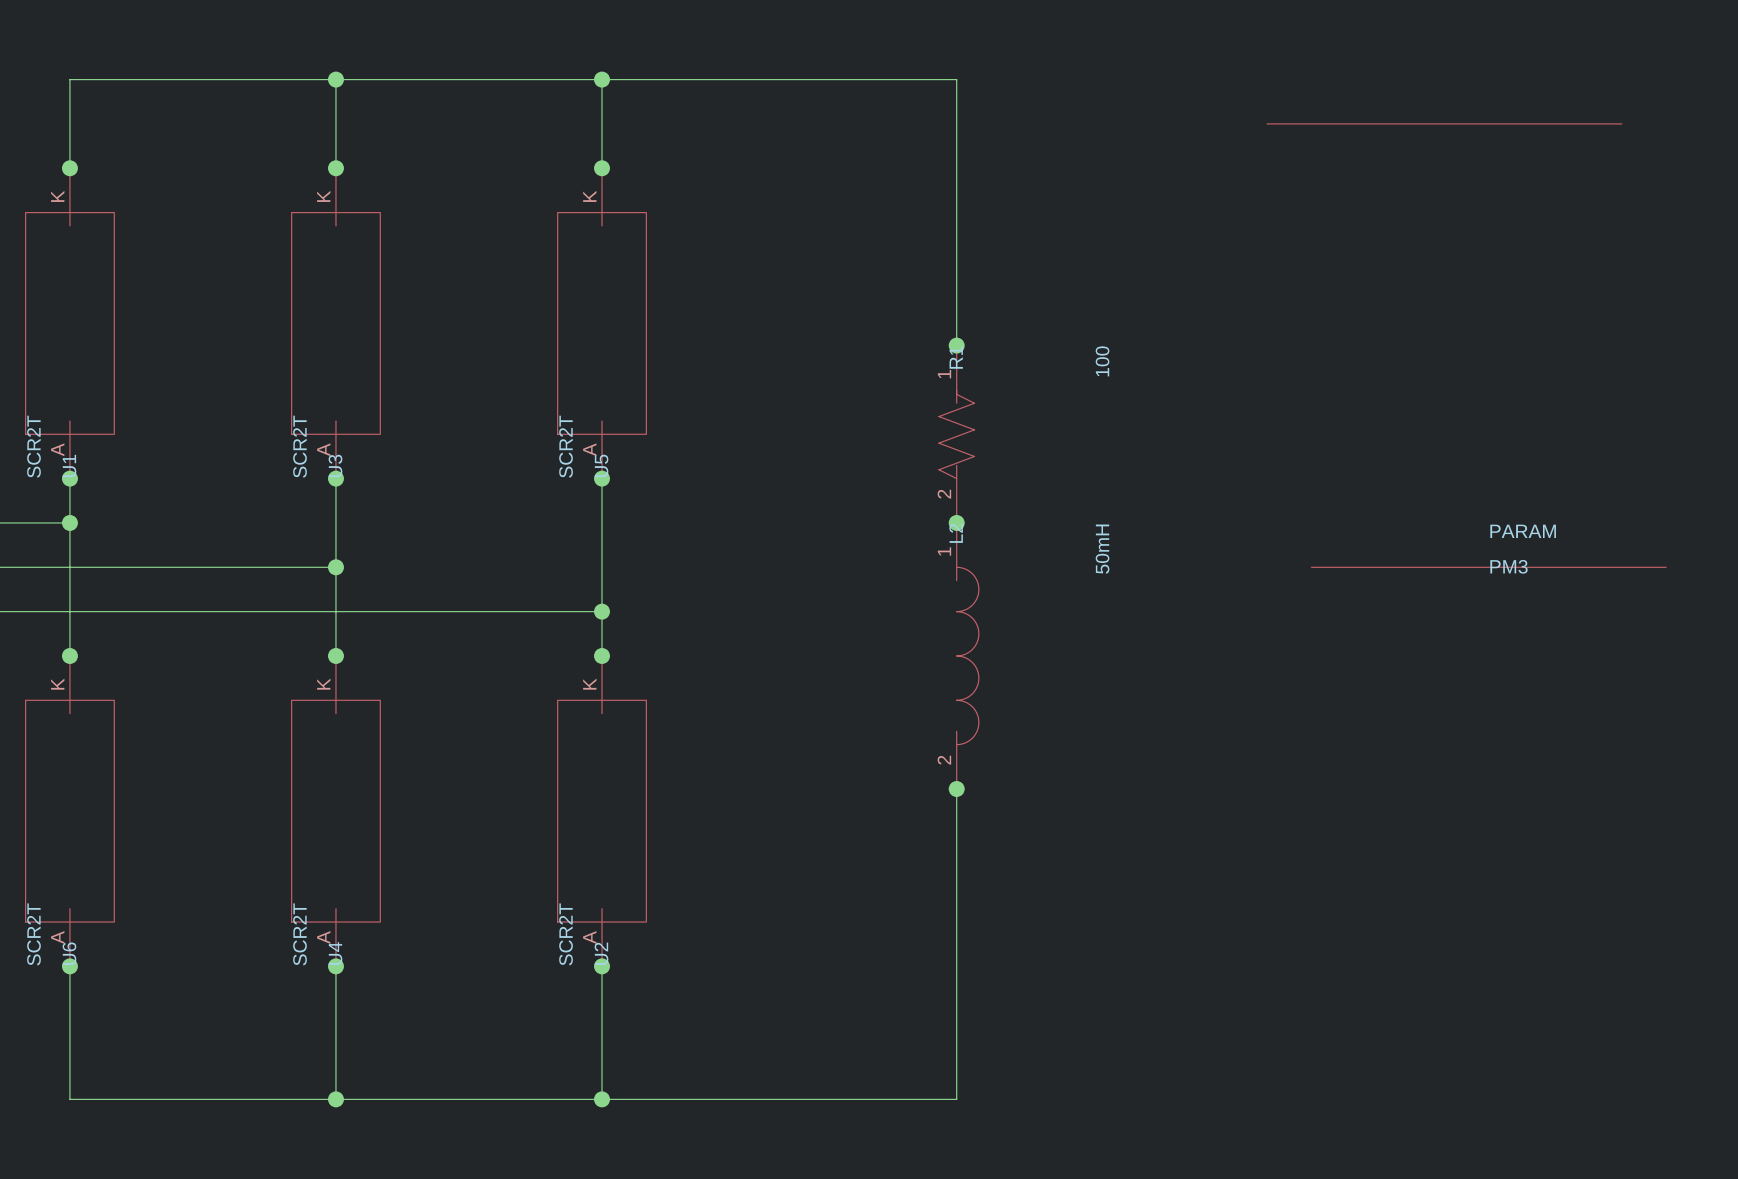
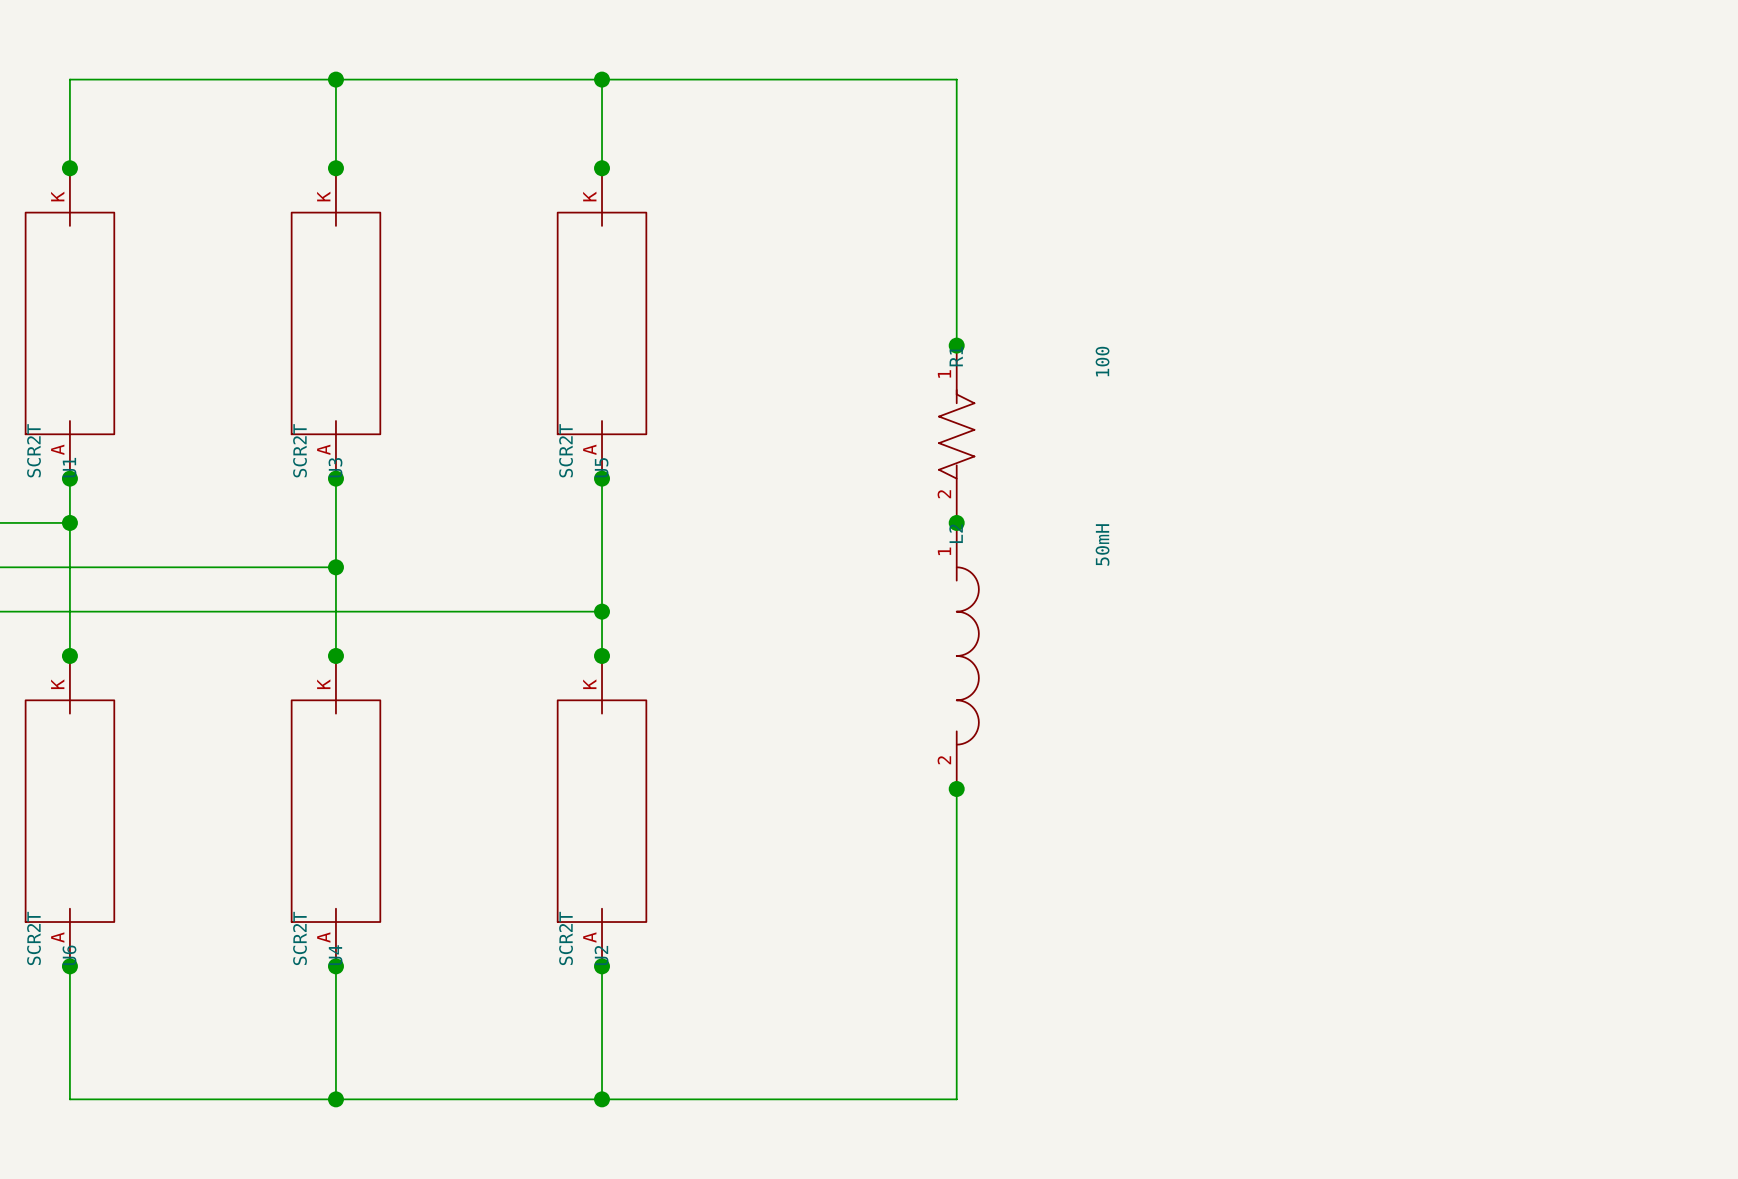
part: (1444, 123) -> none
PM3: PARAM (1488, 567) -> none

